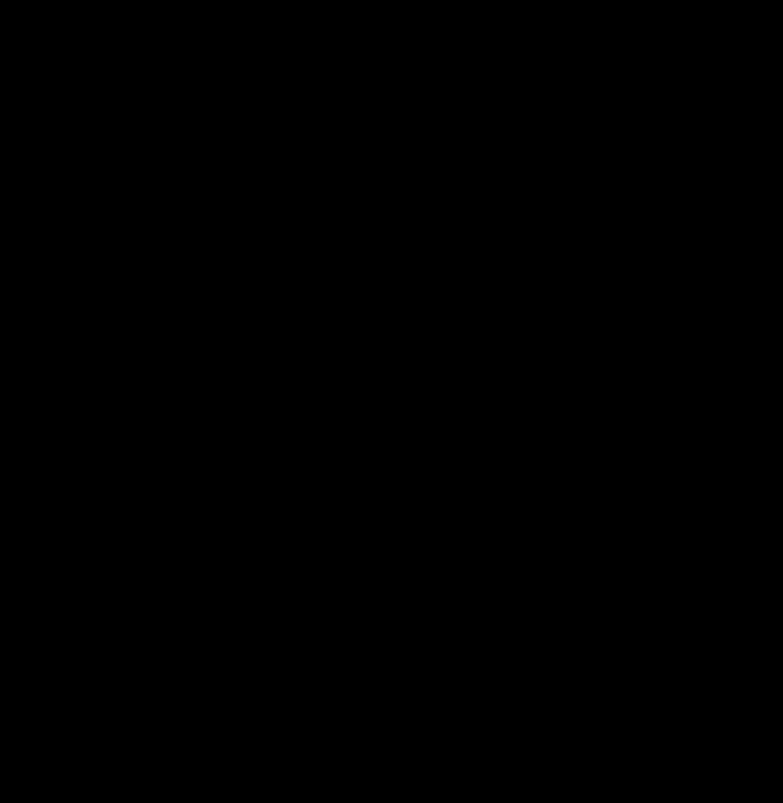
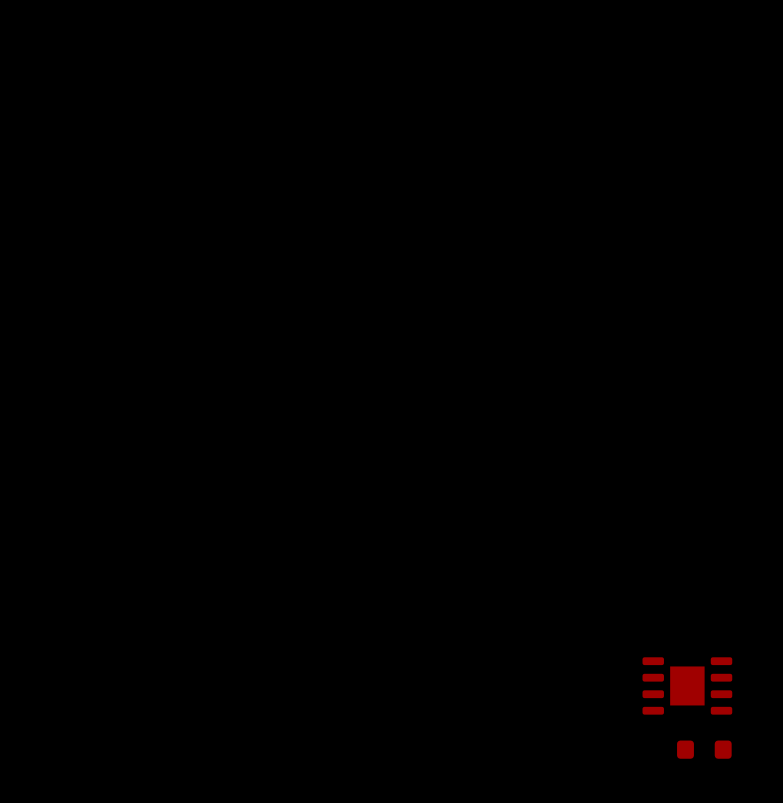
part: none -> (687, 685)
part: none -> (704, 749)

